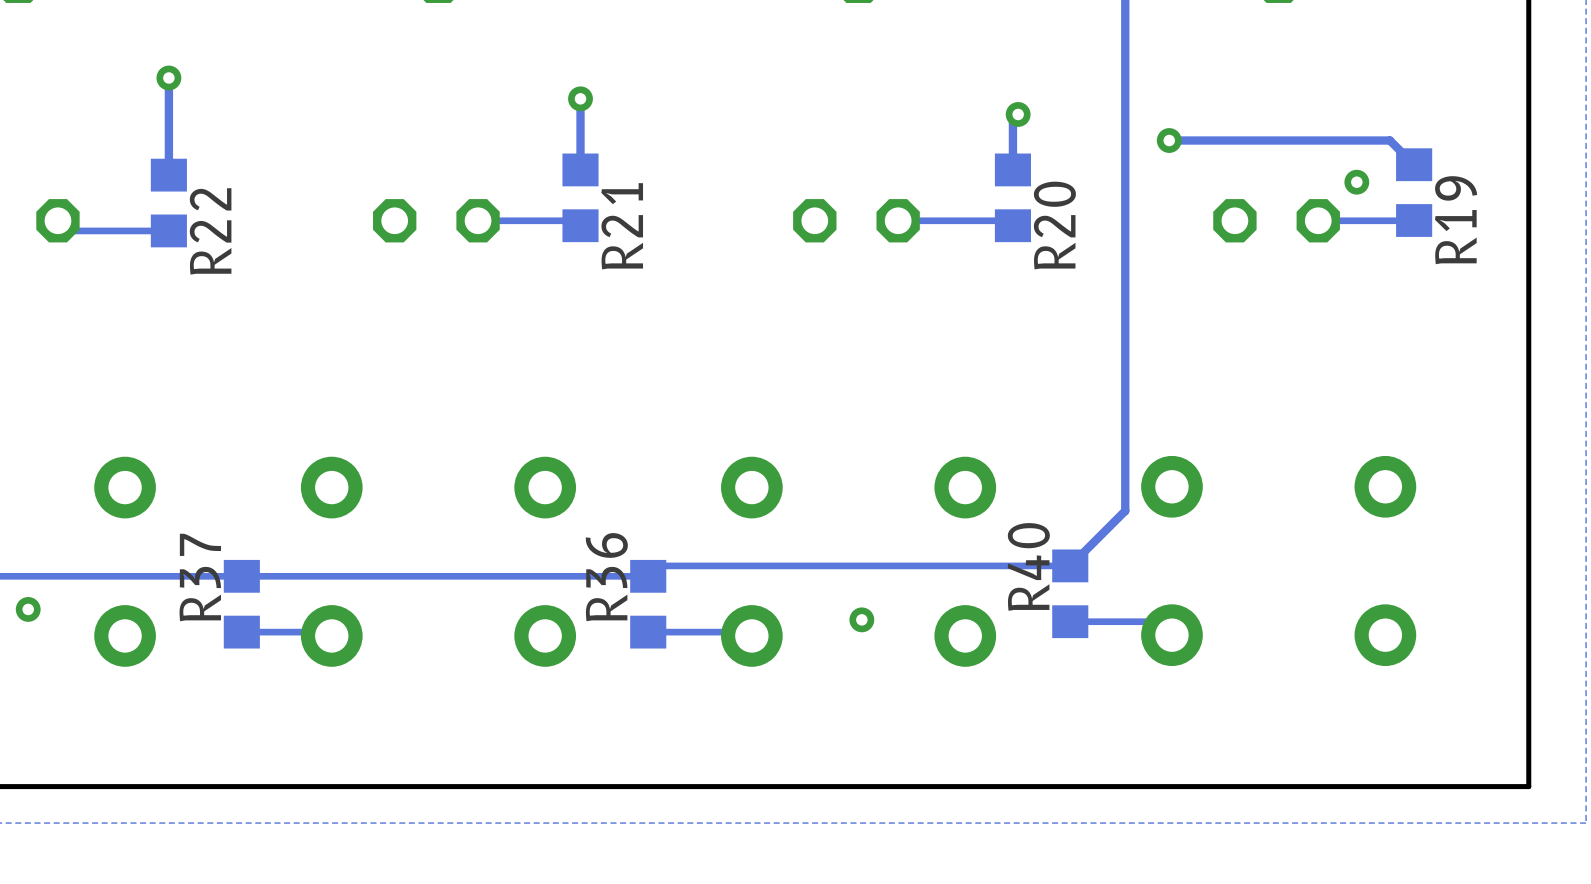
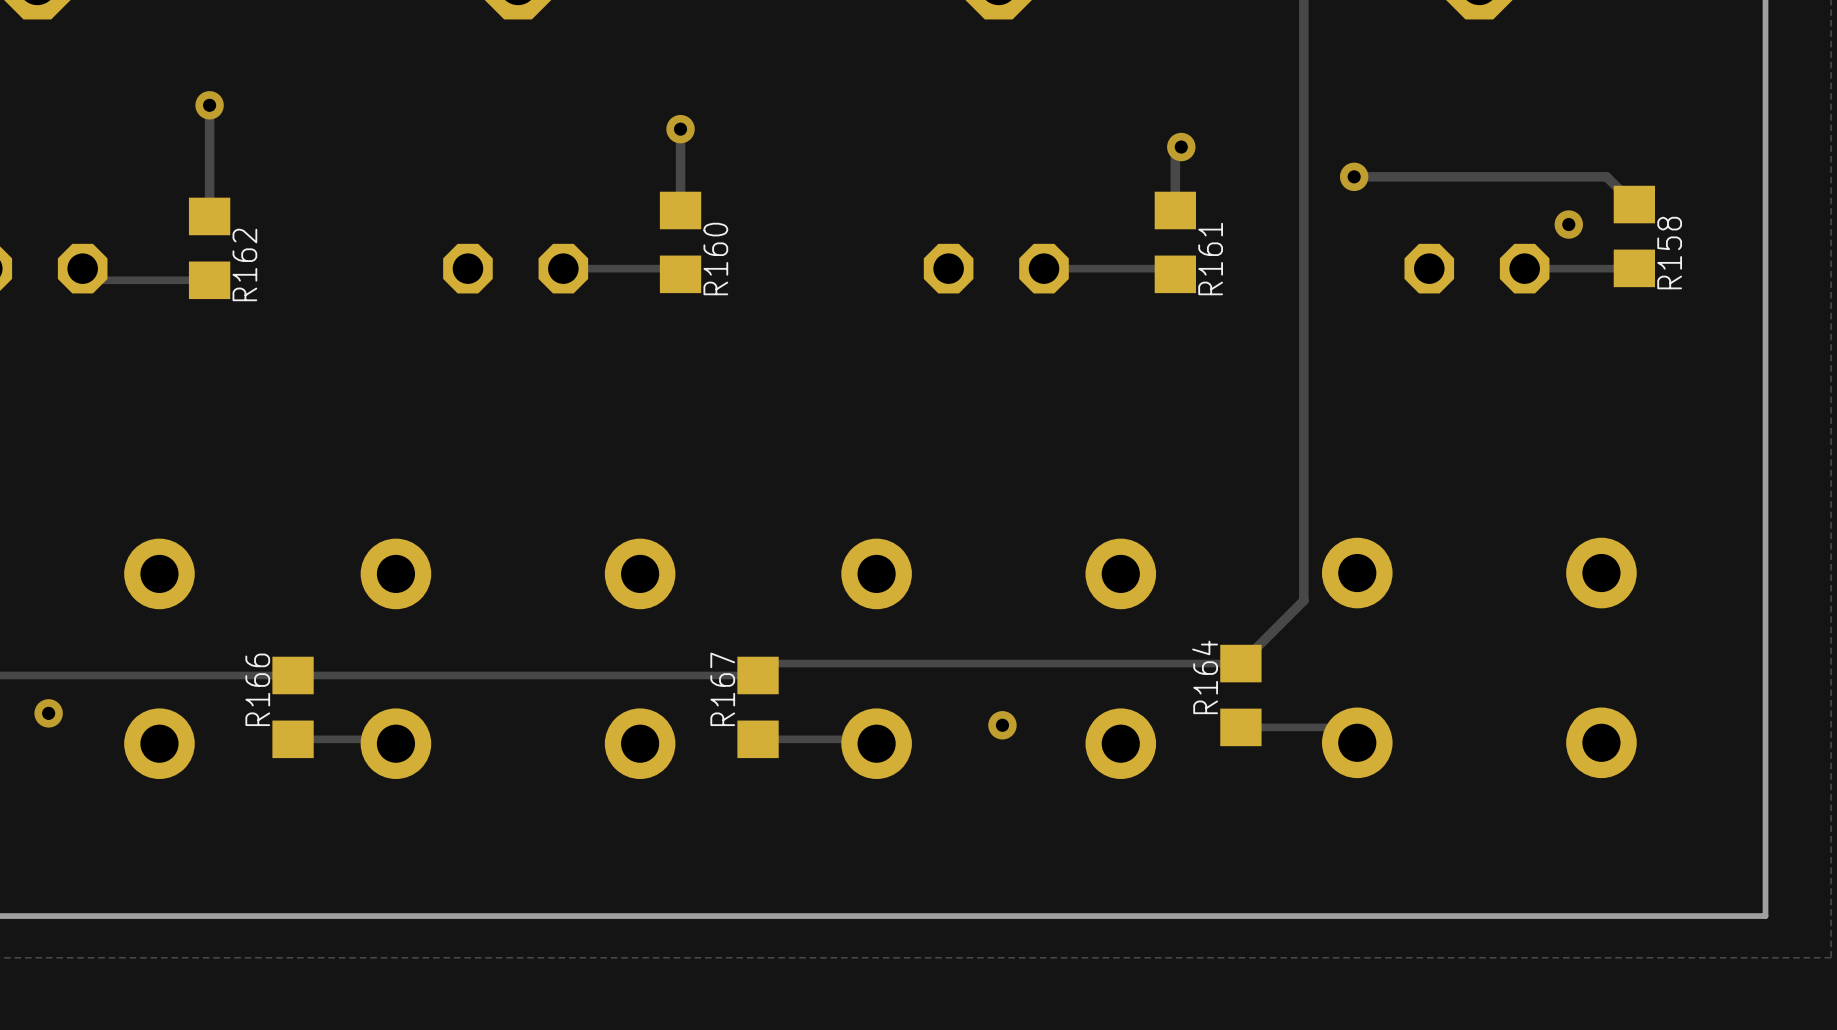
R19 name: R19 (1456, 220) -> R158 (1669, 253)
R20 name: R20 (1054, 225) -> R161 (1210, 259)
R21 name: R21 (622, 226) -> R160 (715, 259)
R22 name: R22 (210, 231) -> R162 (244, 264)
R40 name: R40 (1028, 566) -> R164 (1205, 677)
R37 name: R37 (200, 577) -> R166 (257, 689)
R36 name: R36 (606, 577) -> R167 (722, 689)

